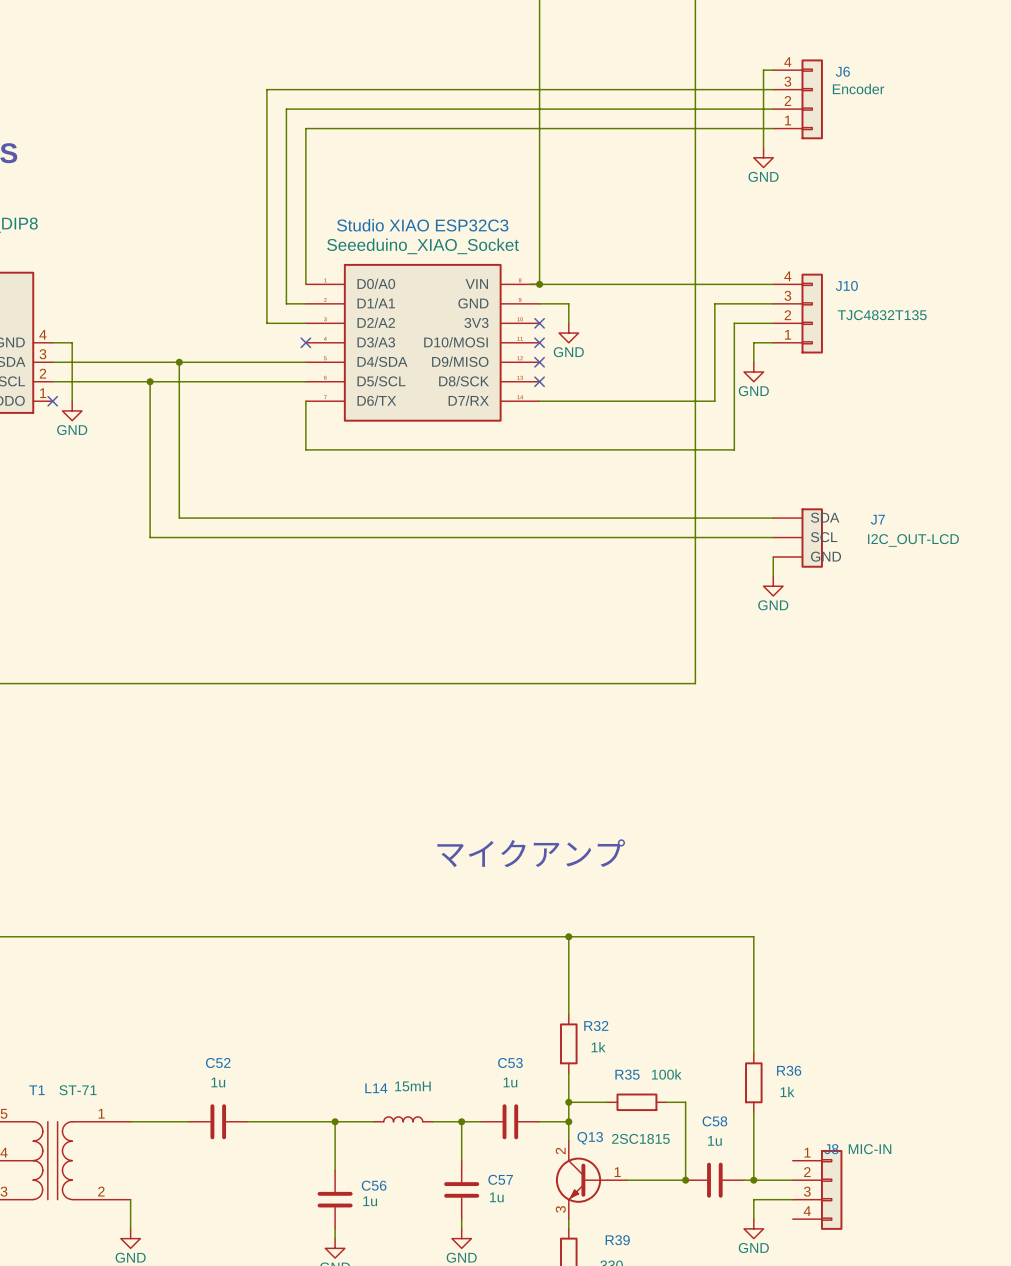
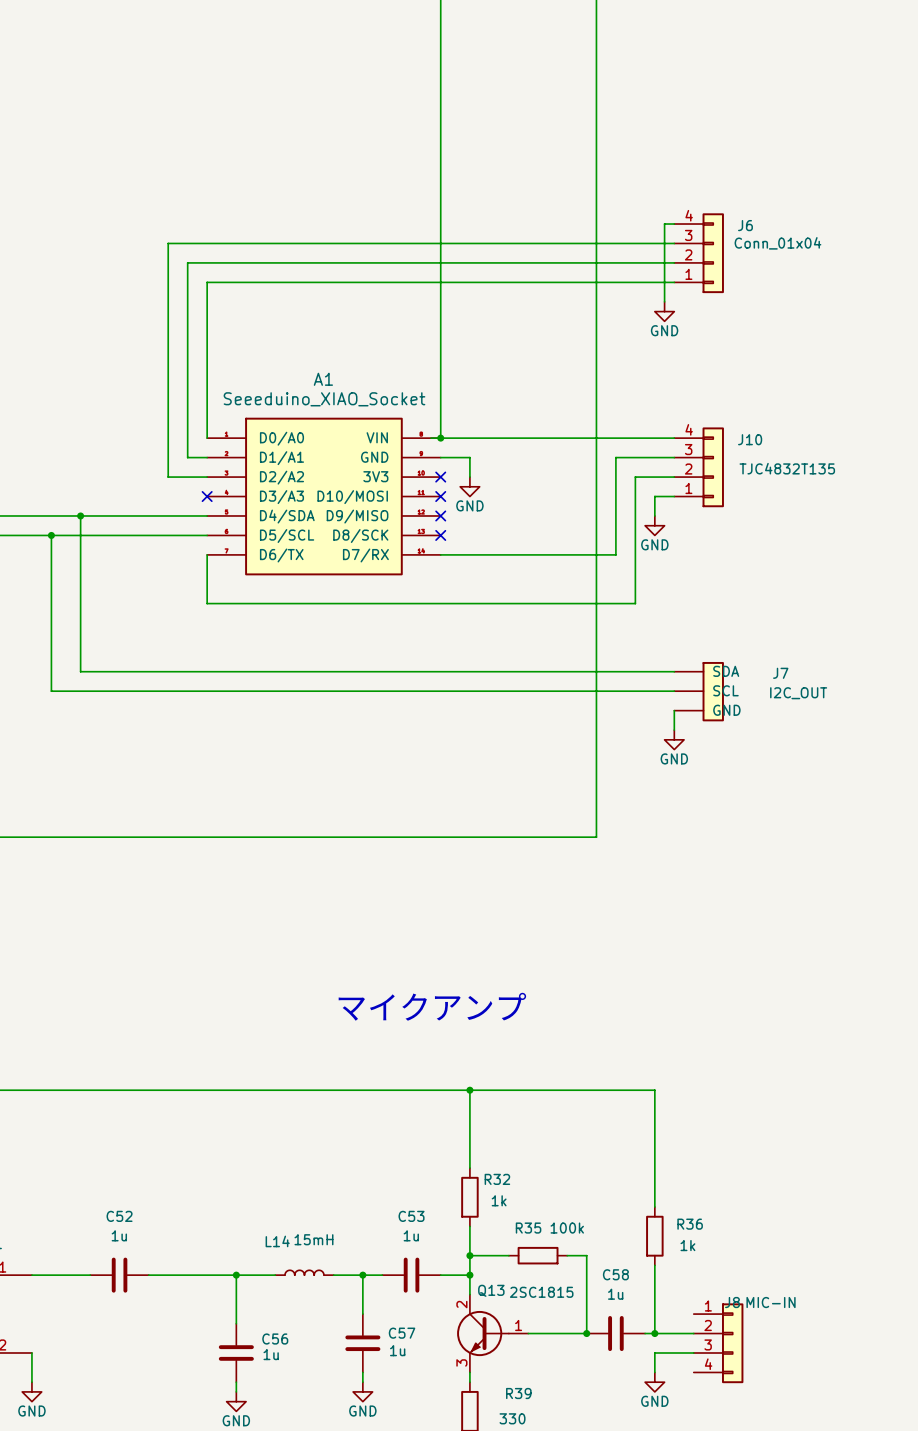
J6 value: Encoder (858, 89) -> Conn_01x04 (777, 243)
Studio XIAO ESP32C3 name: Studio XIAO ESP32C3 (422, 225) -> A1 (323, 379)
J7 value: I2C_OUT-LCD (913, 540) -> I2C_OUT (798, 693)

